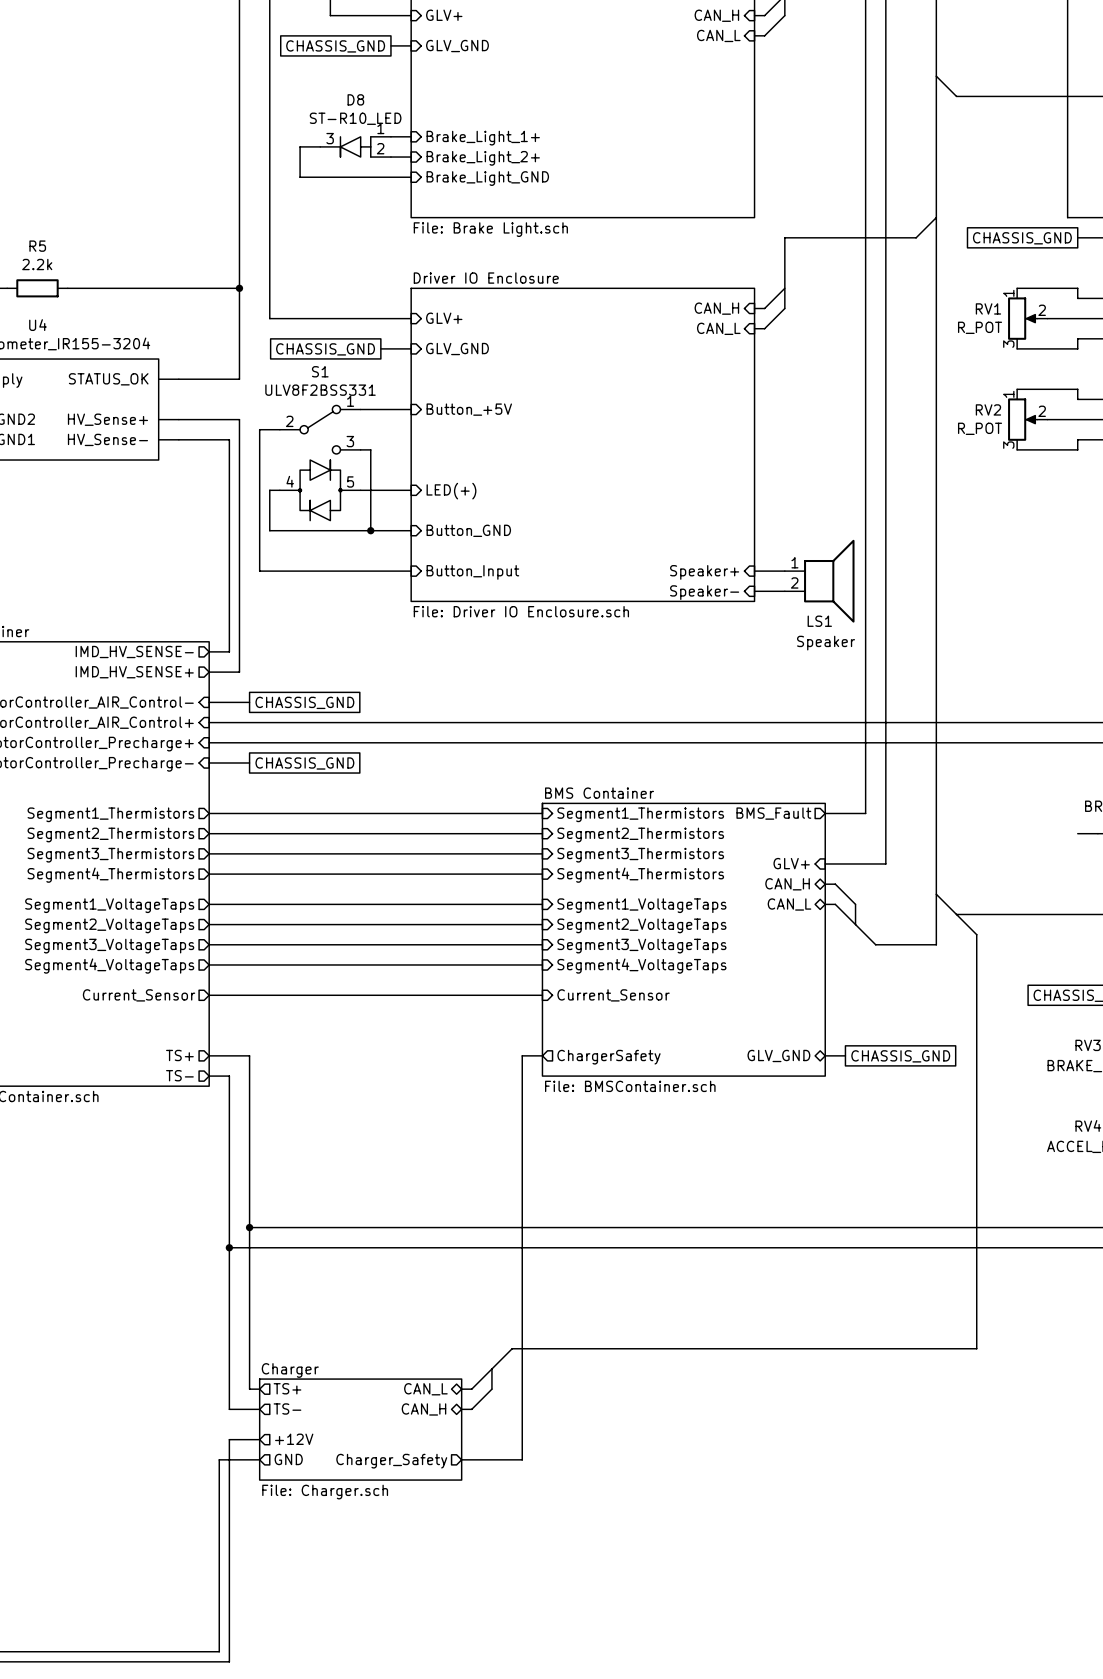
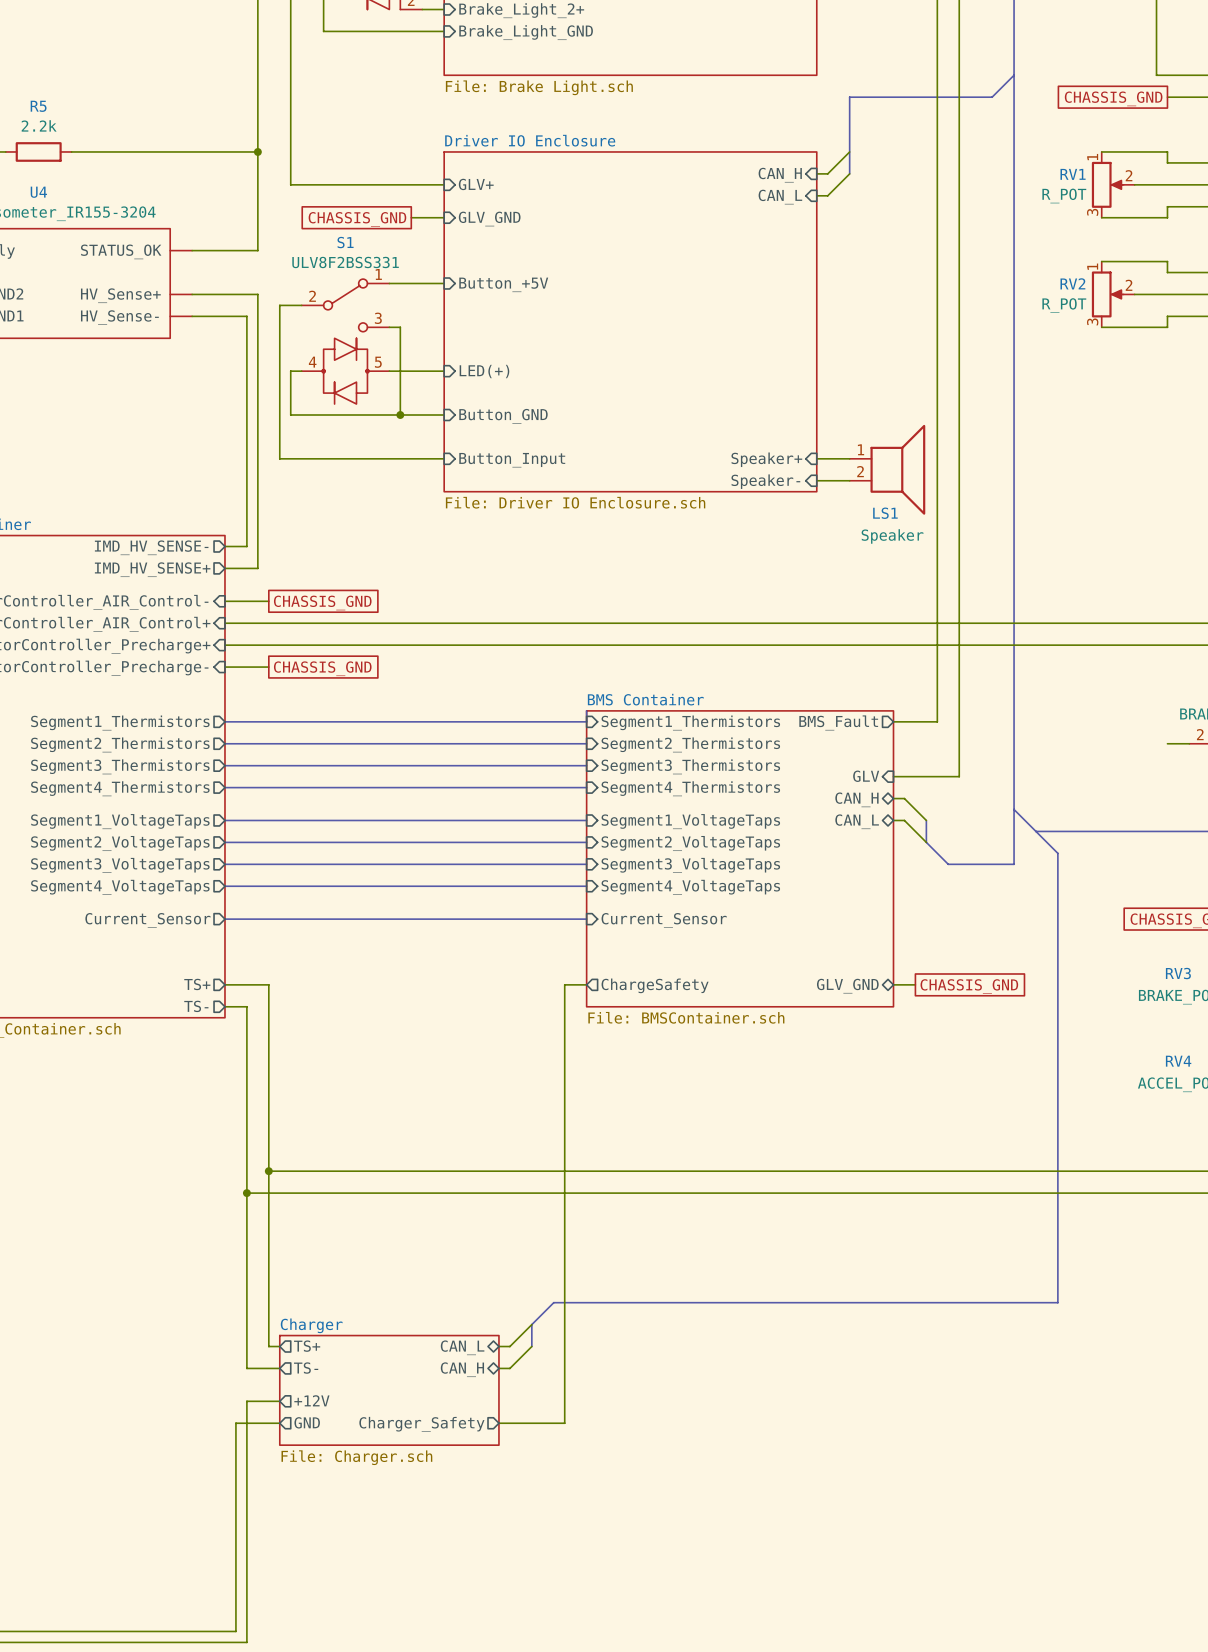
sheet pin: GLV+ (791, 863) -> GLV (866, 776)
sheet pin: ChargerSafety (608, 1057) -> ChargeSafety (655, 985)

